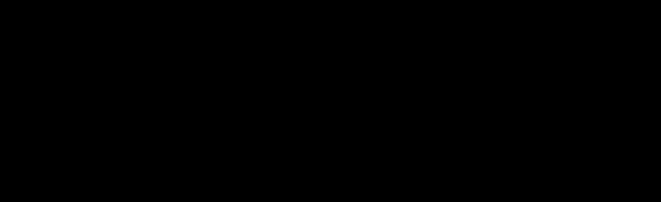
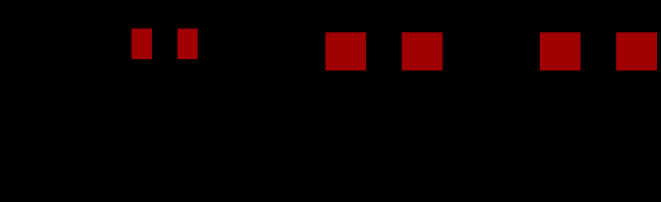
part: none -> (164, 43)
part: none -> (383, 51)
part: none -> (598, 51)

